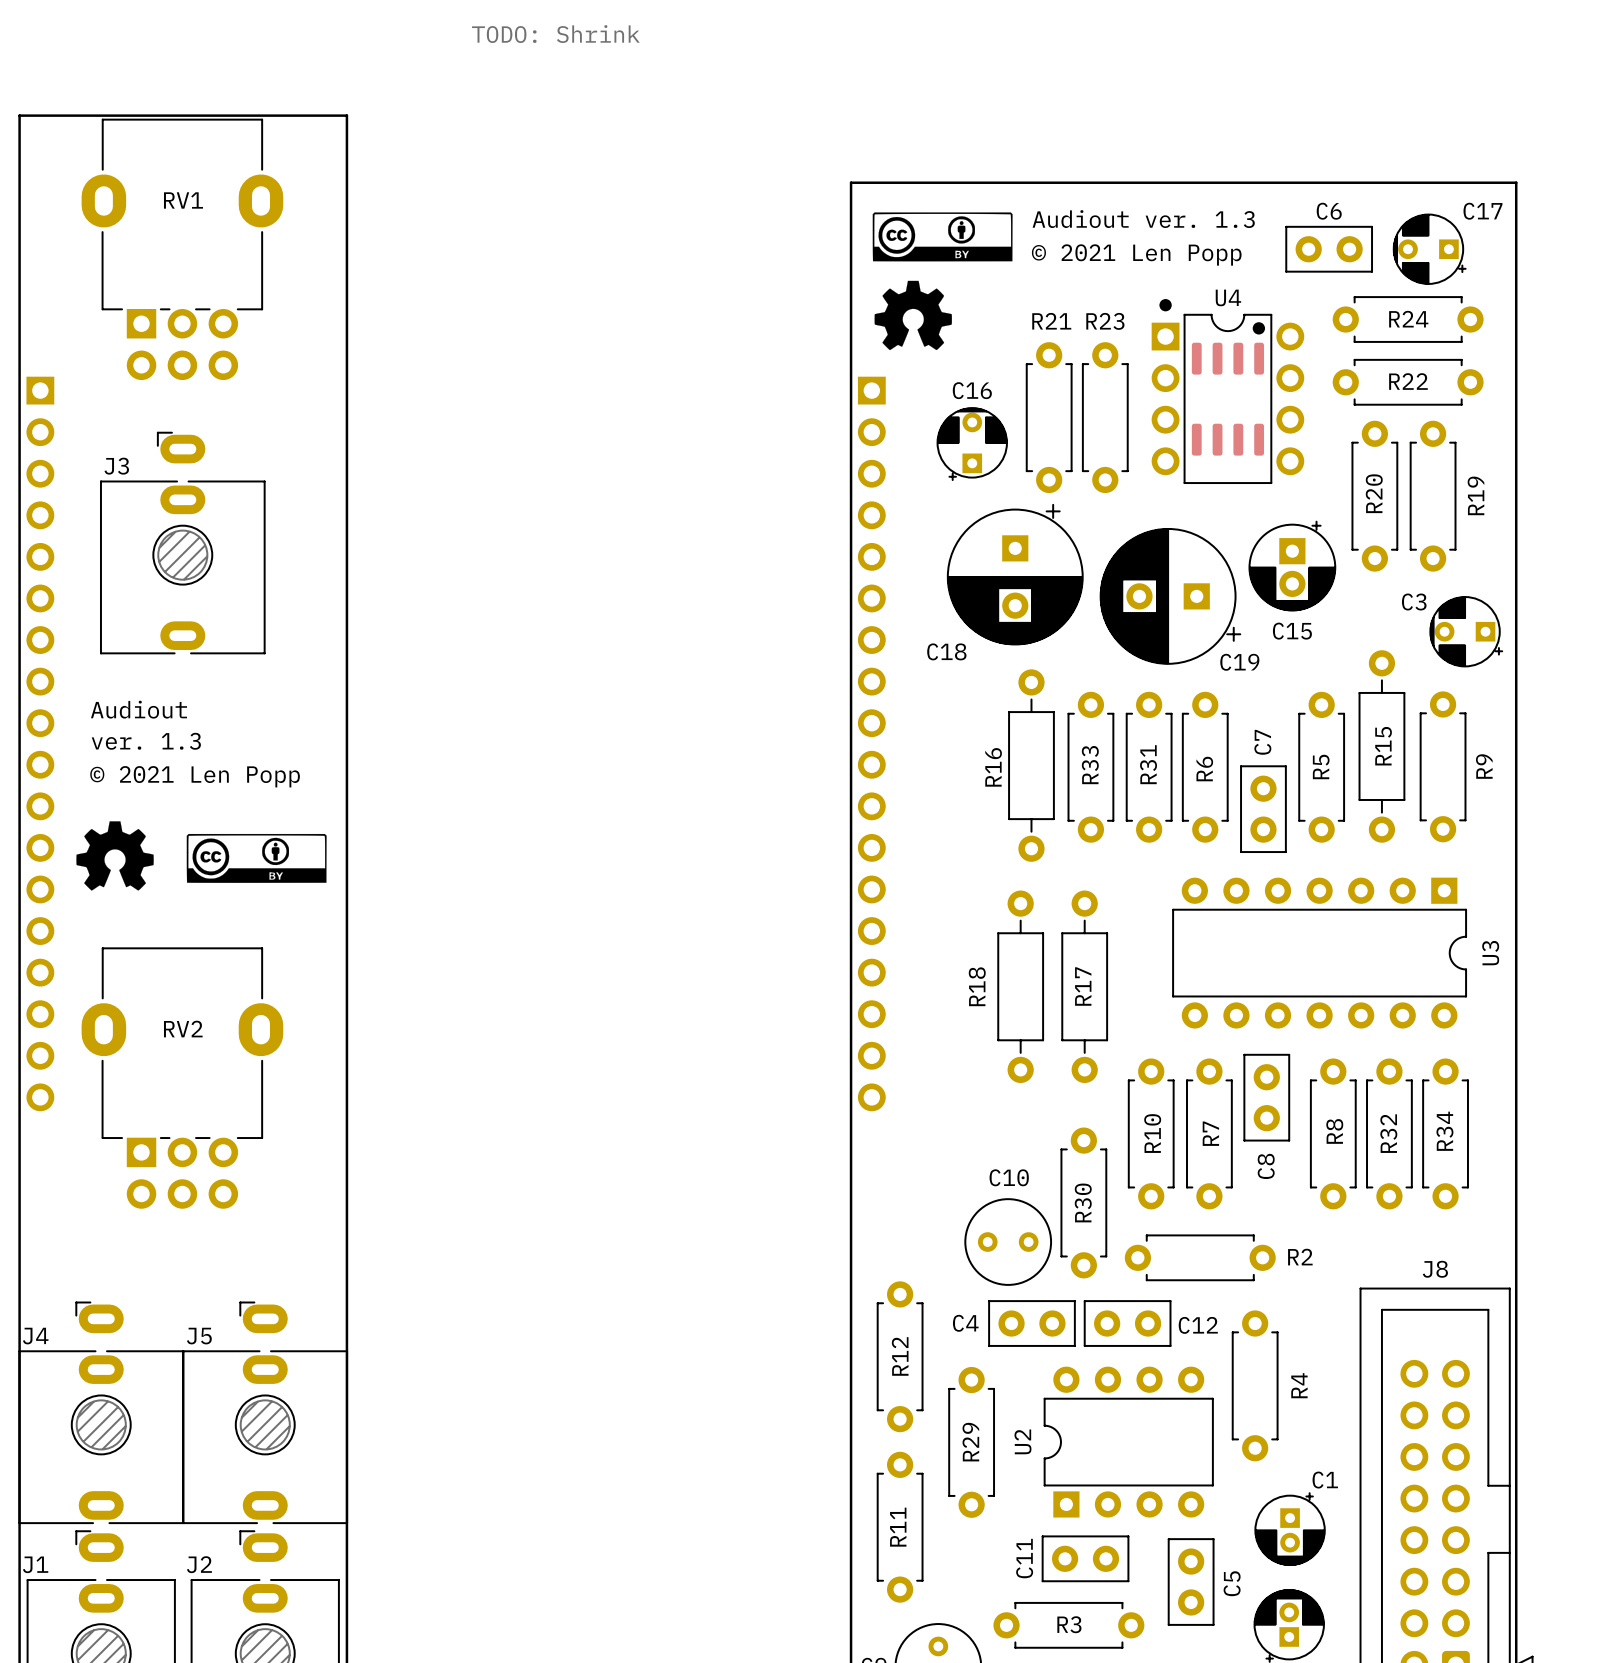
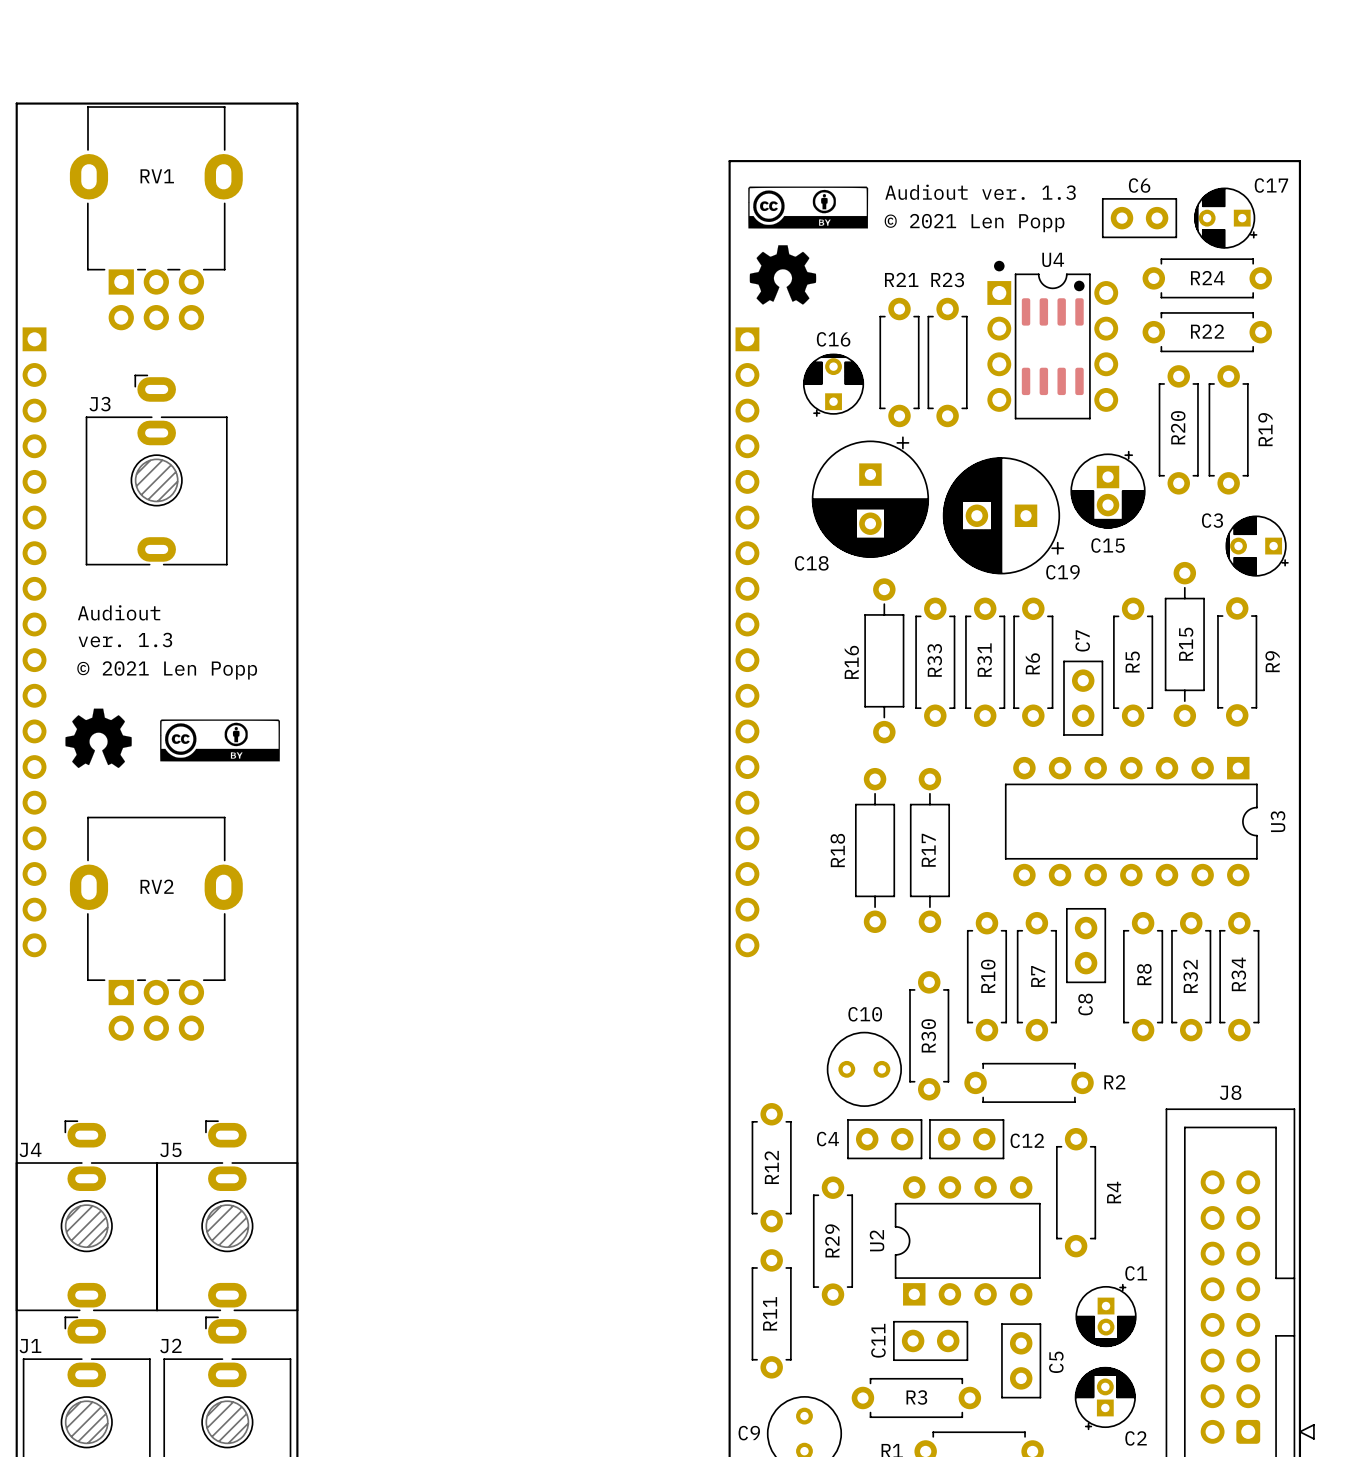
text: TODO: Shrink (555, 34) -> none

